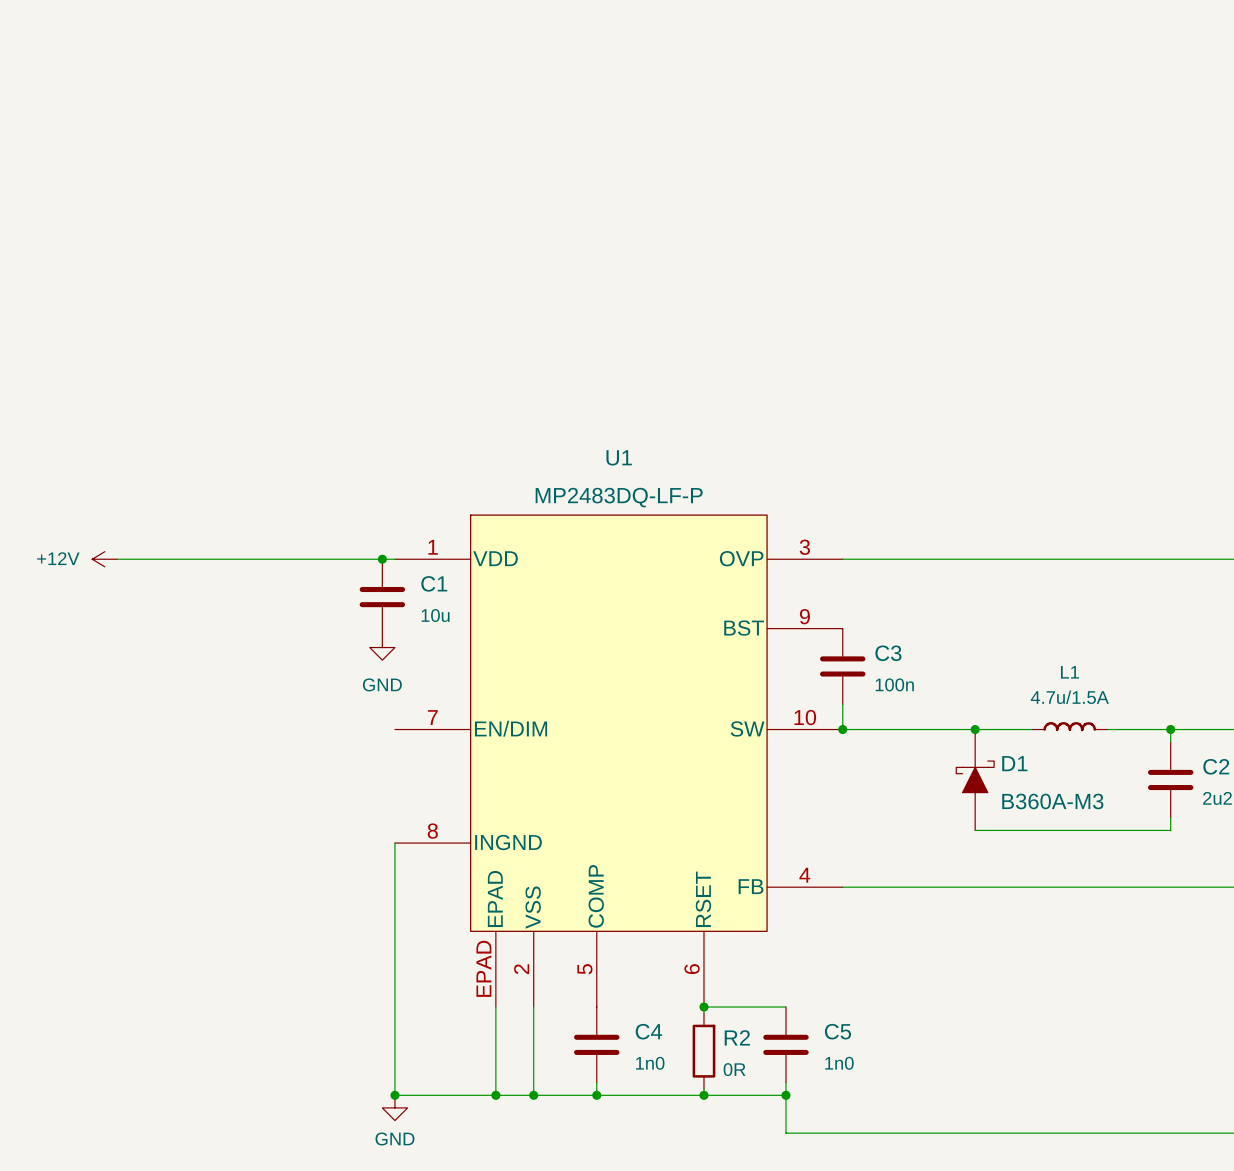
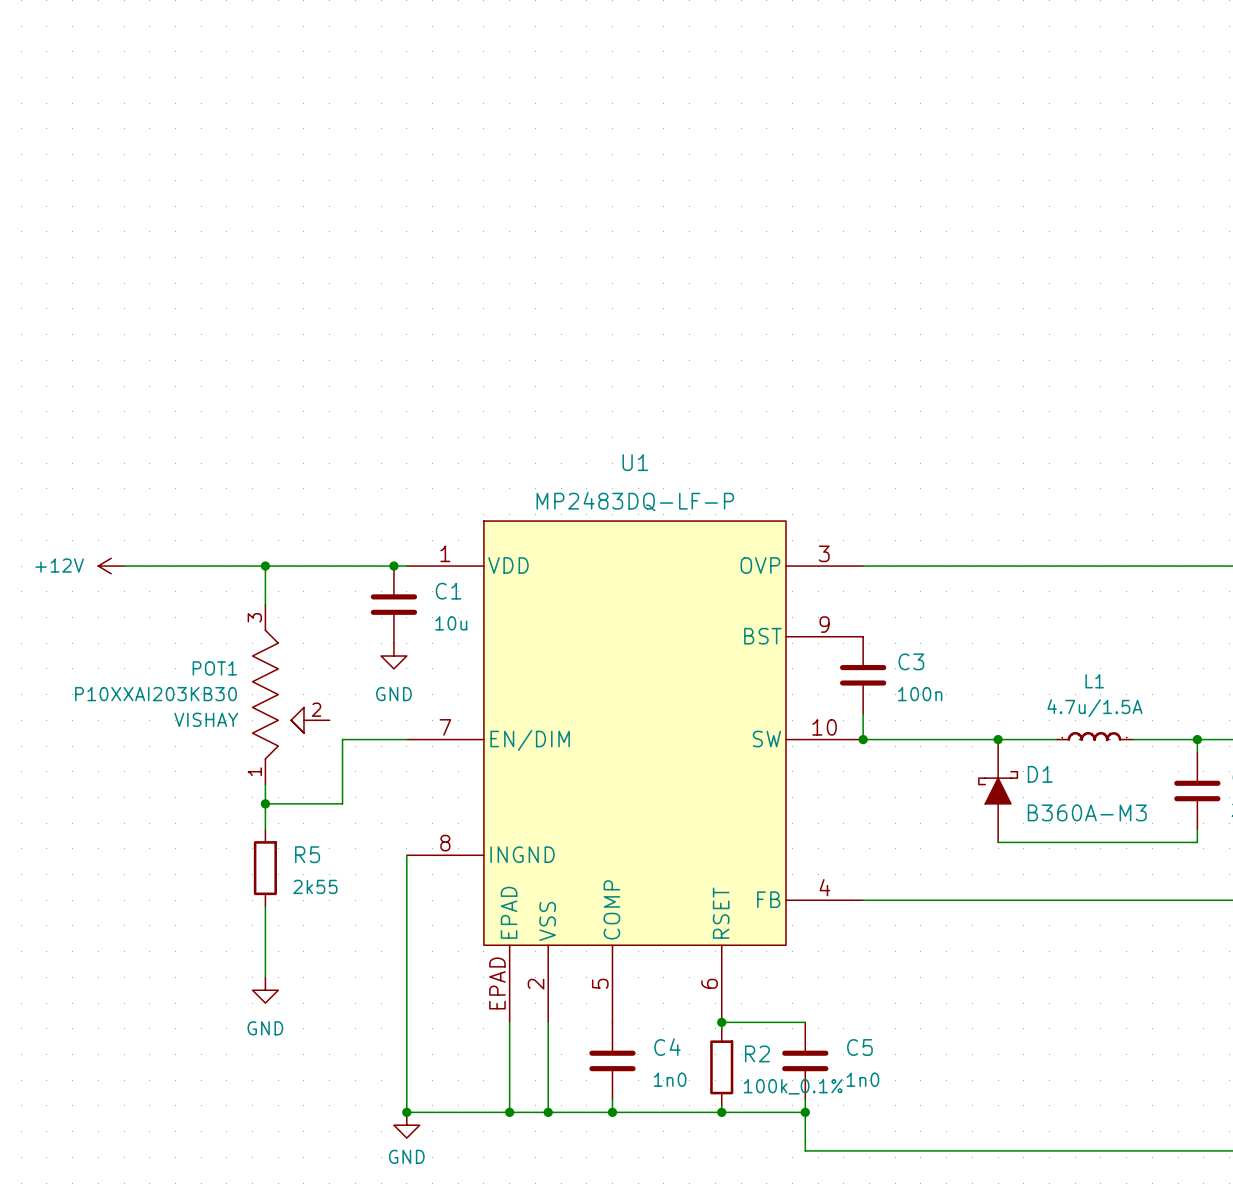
wire: none -> (265, 566) (265, 604)
junction: none -> (265, 566)
POT1: none -> P10XXAI203KB30 (291, 694)
wire: none -> (406, 739) (342, 739) (342, 803) (265, 803)
wire: none -> (265, 784) (265, 829)
junction: none -> (265, 803)
R5: none -> (265, 868)
wire: none -> (265, 906) (265, 977)
power symbol: none -> GND (265, 990)
R2 text: 0R (734, 1069) -> 100k_0.1% (793, 1086)

